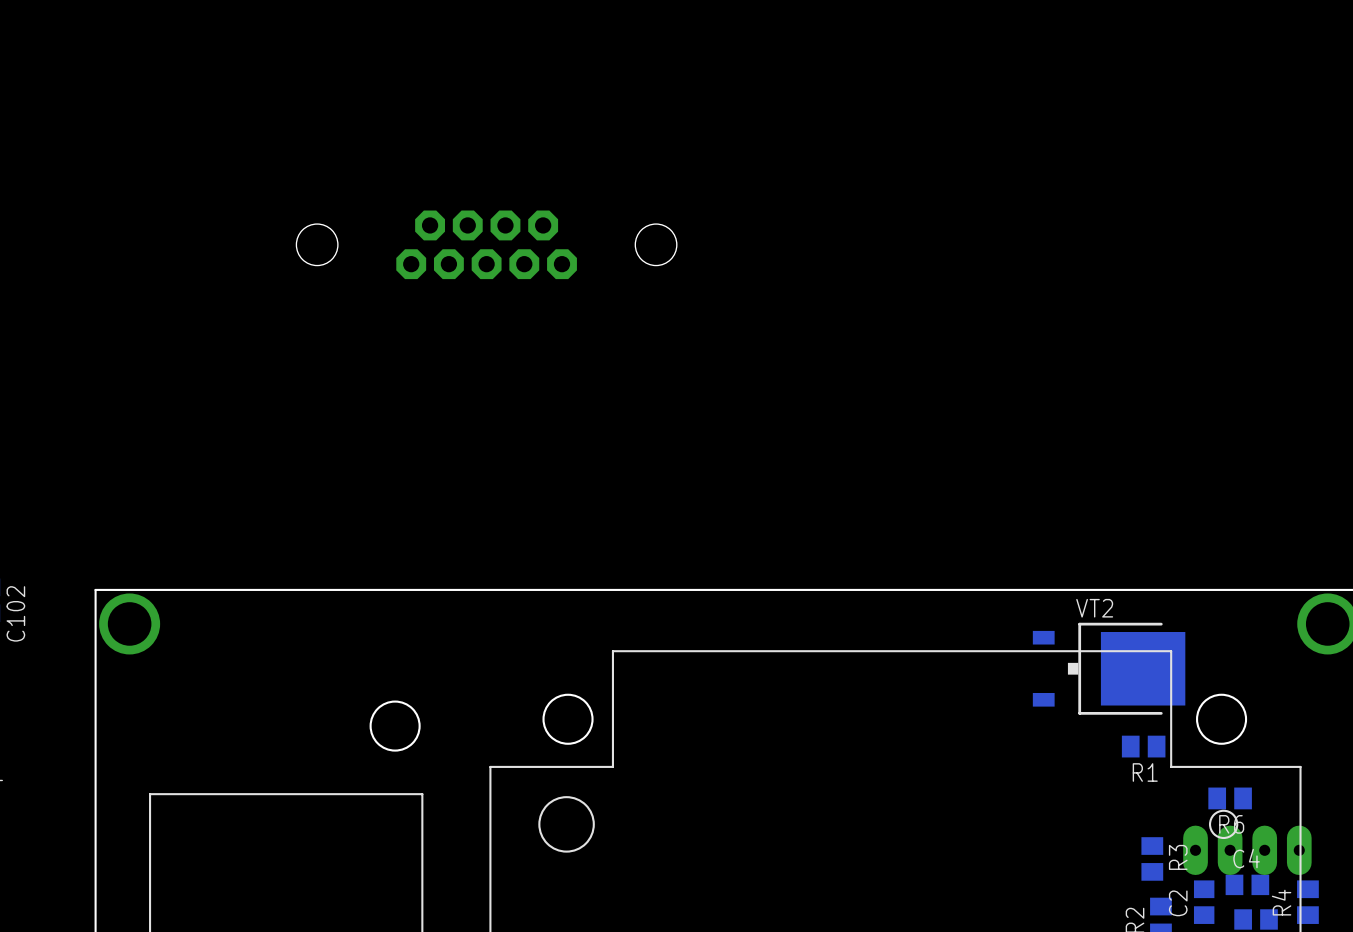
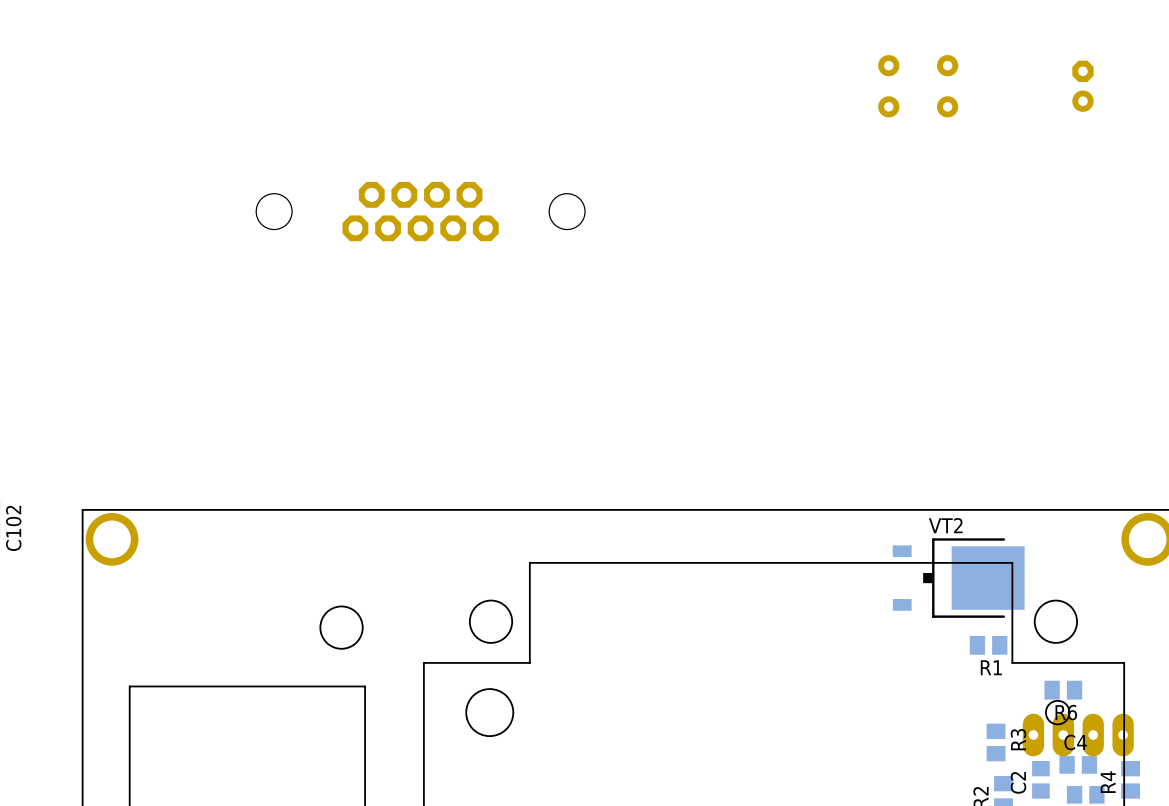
part: none -> (888, 86)
part: none -> (947, 86)
part: none -> (1082, 86)

